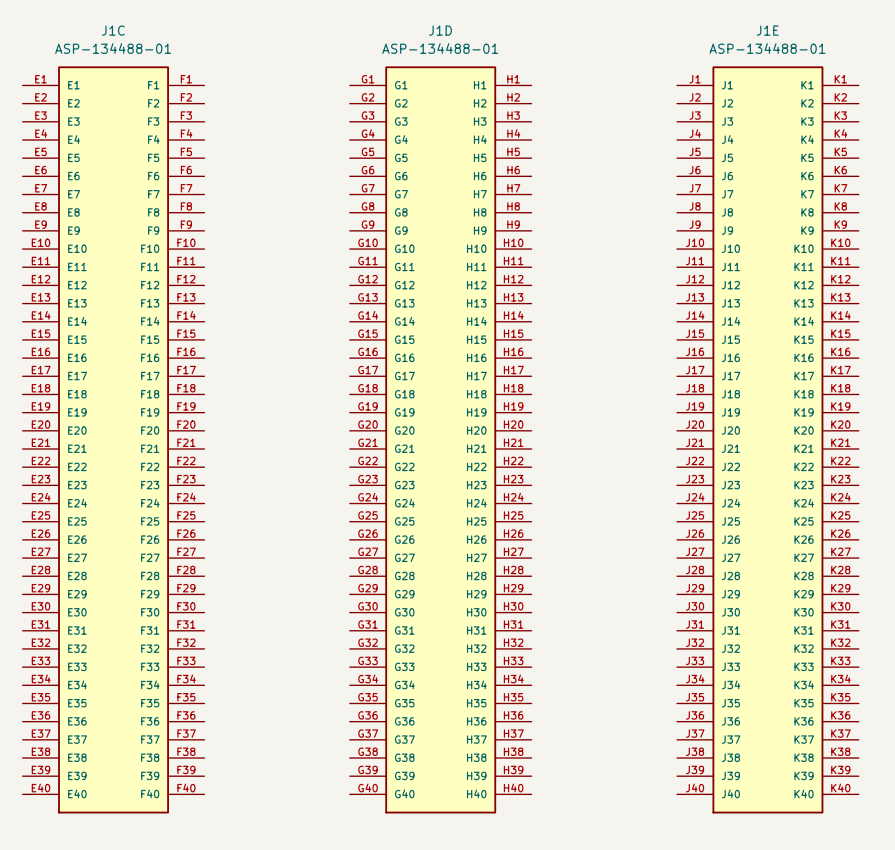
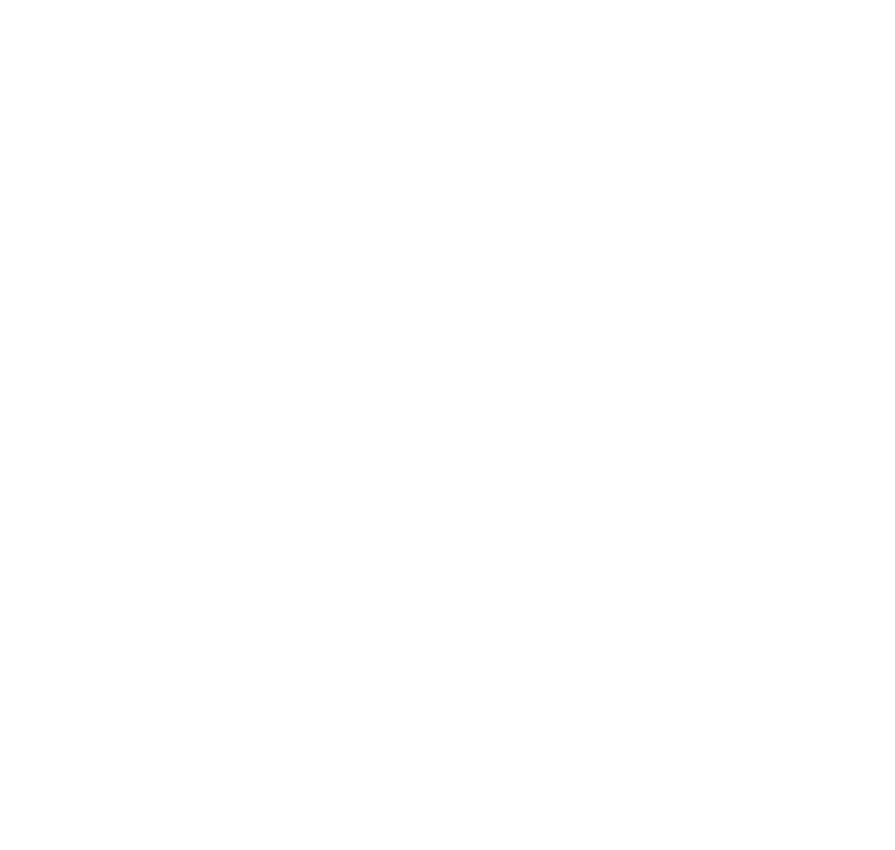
J1C: ASP-134488-01 (113, 439) -> none
J1D: ASP-134488-01 (440, 439) -> none
J1E: ASP-134488-01 (767, 439) -> none

